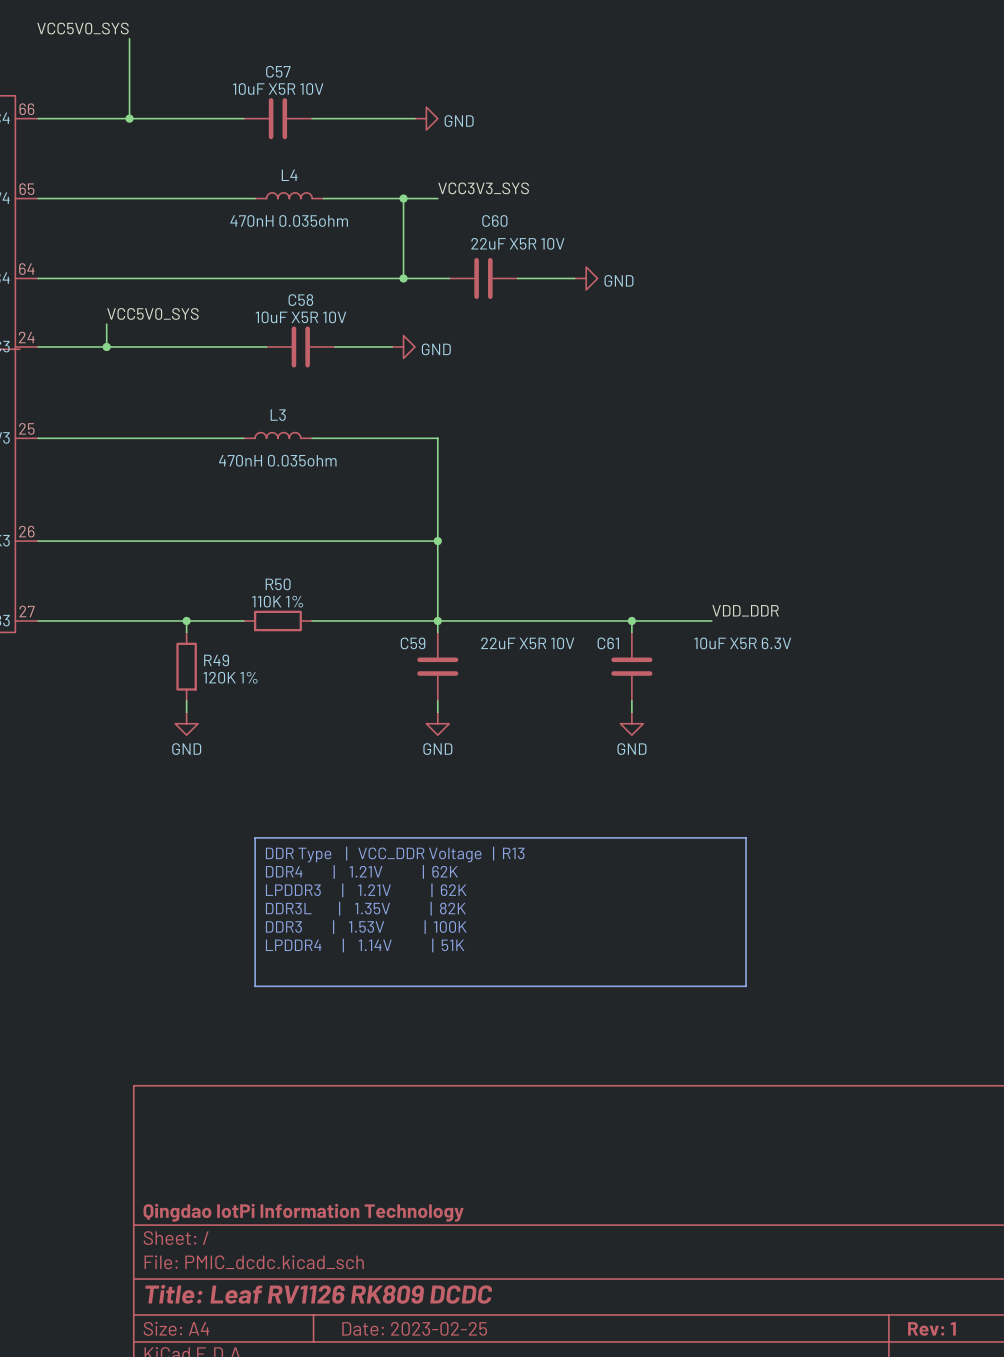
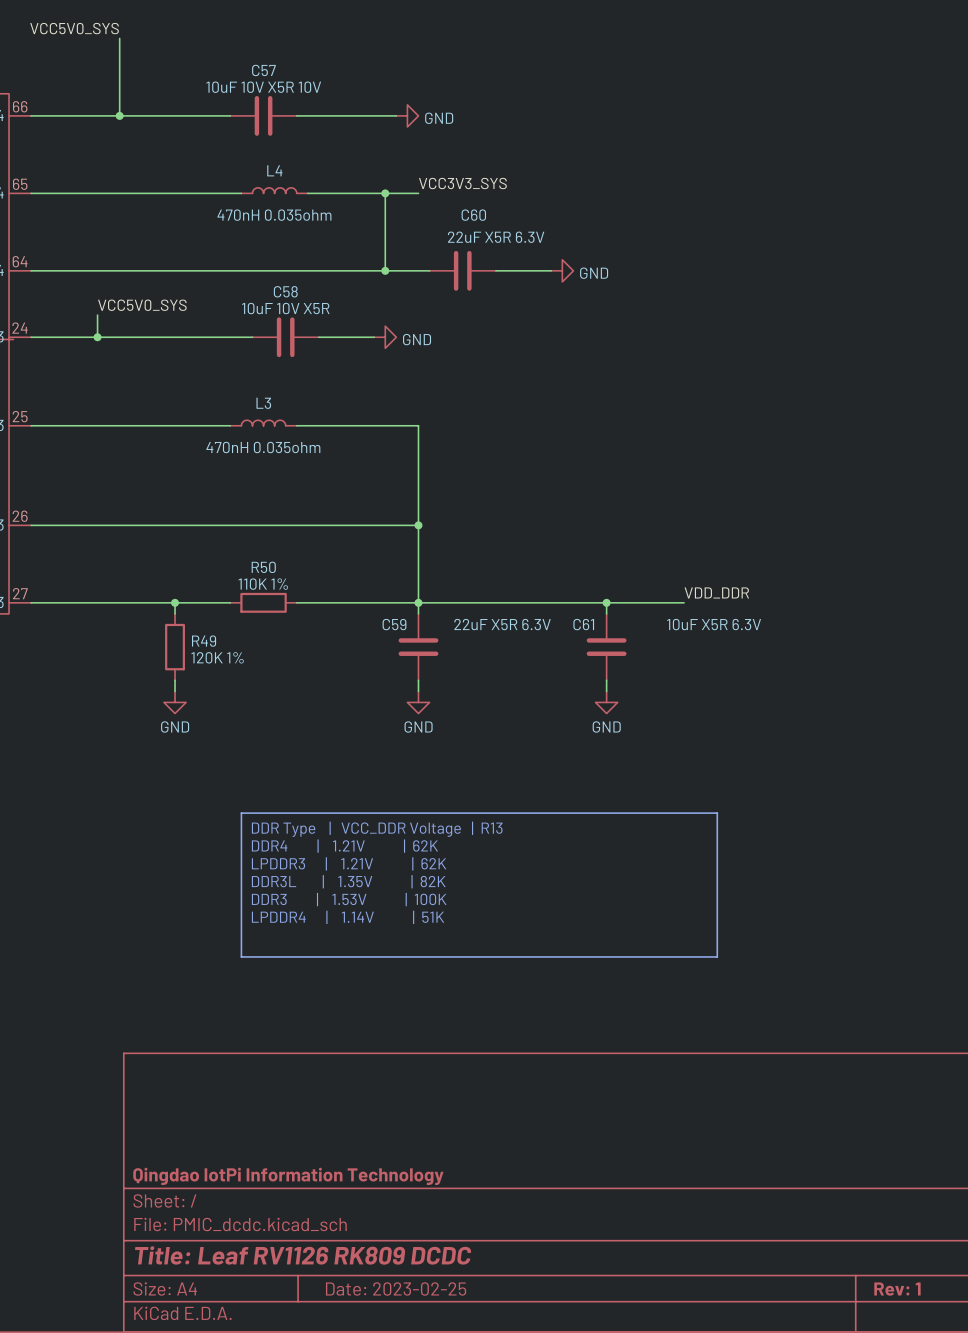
C57 value: 10uF X5R 10V (278, 89) -> 10uF 10V X5R 10V (263, 87)
C60 value: 22uF X5R 10V (517, 243) -> 22uF X5R 6.3V (496, 237)
C58 value: 10uF X5R 10V (300, 317) -> 10uF 10V X5R (285, 308)
C59 value: 22uF X5R 10V (527, 643) -> 22uF X5R 6.3V (502, 624)

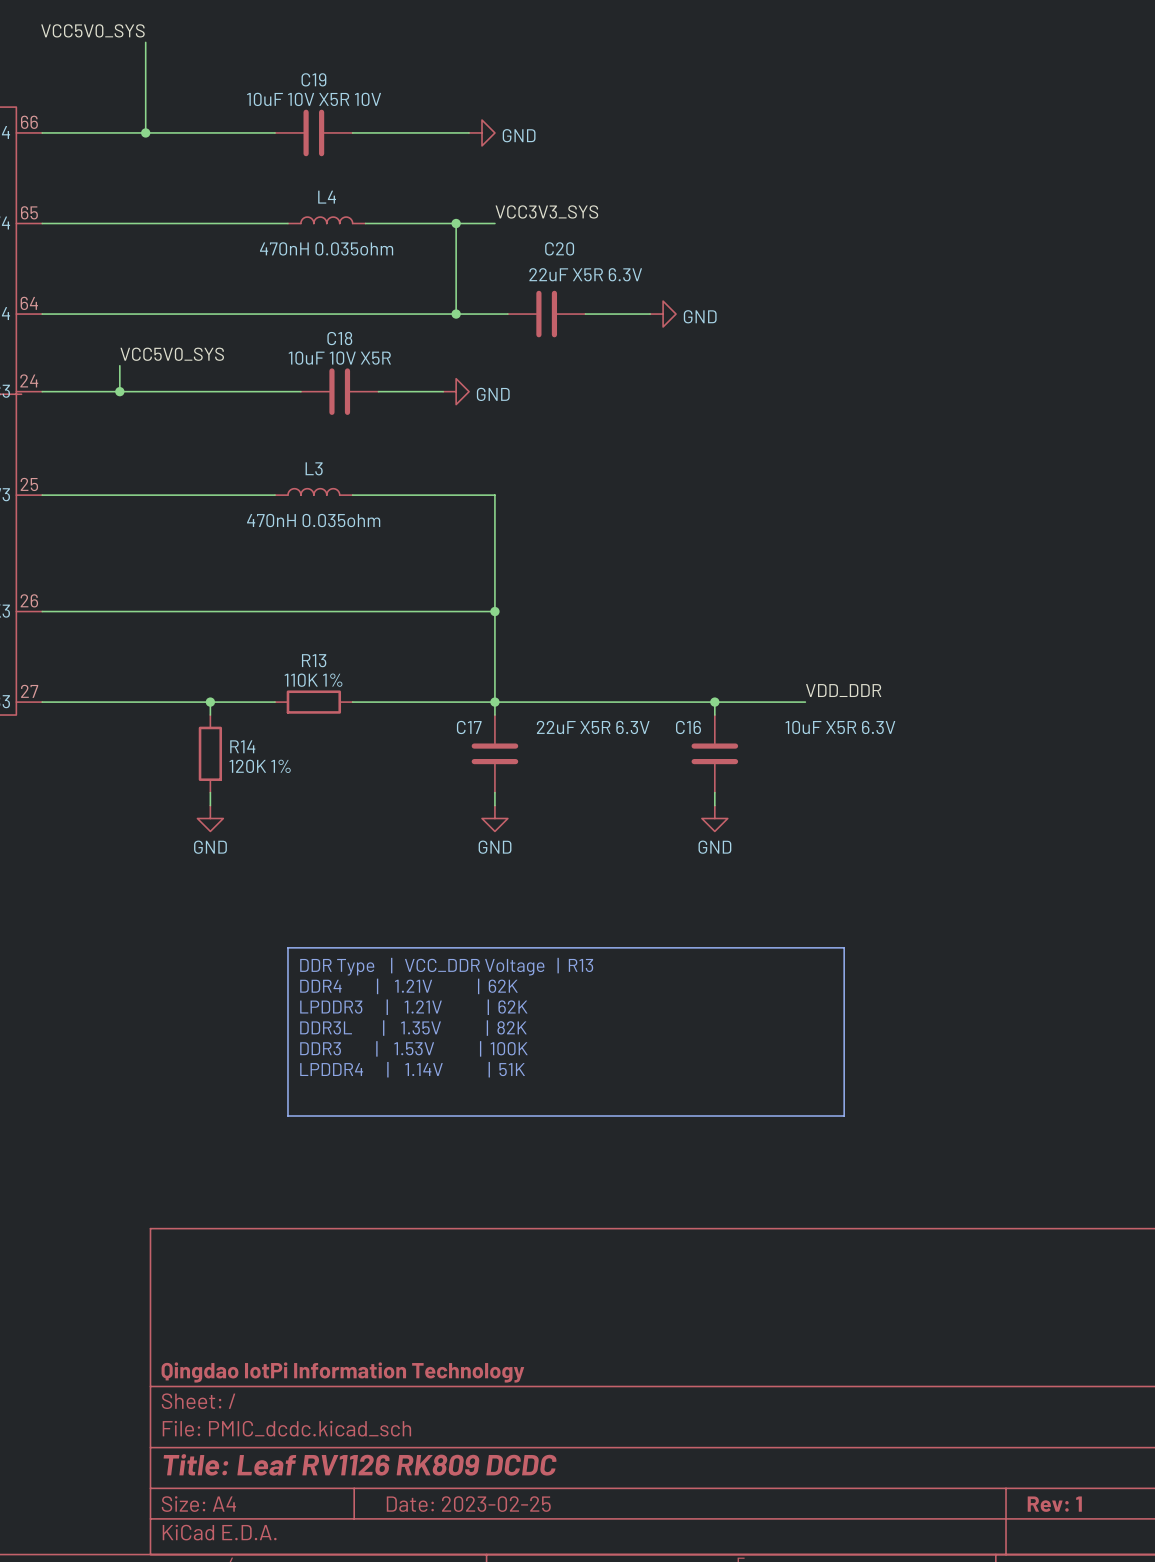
C57 name: C57 (263, 70) -> C19 (313, 79)
C60 name: C60 (473, 215) -> C20 (559, 248)
C58 name: C58 (285, 291) -> C18 (339, 338)
R50 name: R50 (263, 567) -> R13 (314, 660)
C59 name: C59 (394, 624) -> C17 (469, 727)
C61 name: C61 (583, 624) -> C16 (688, 727)
R49 name: R49 (204, 641) -> R14 (242, 746)

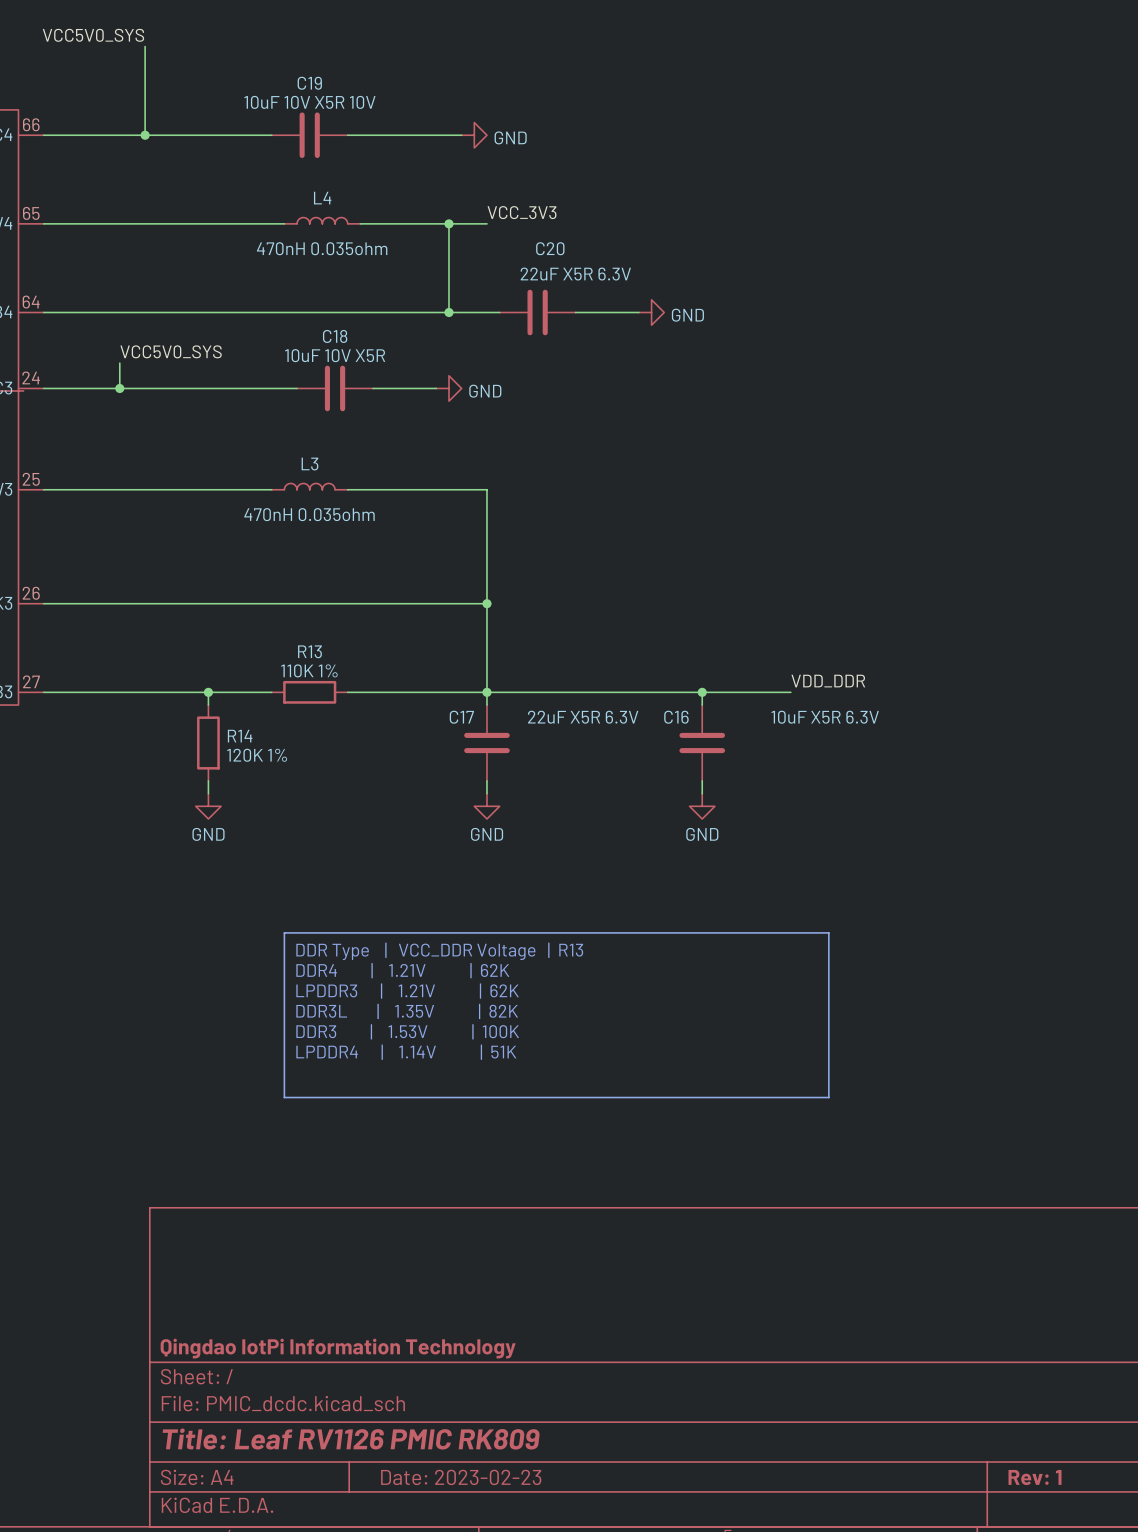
label: VCC3V3_SYS (546, 211) -> VCC_3V3 (522, 212)
title block: Title: Leaf RV1126 RK809 DCDC (360, 1464) -> Title: Leaf RV1126 PMIC RK809 (351, 1439)
title block: Date: 2023-02-25 (468, 1504) -> Date: 2023-02-23 (461, 1477)

